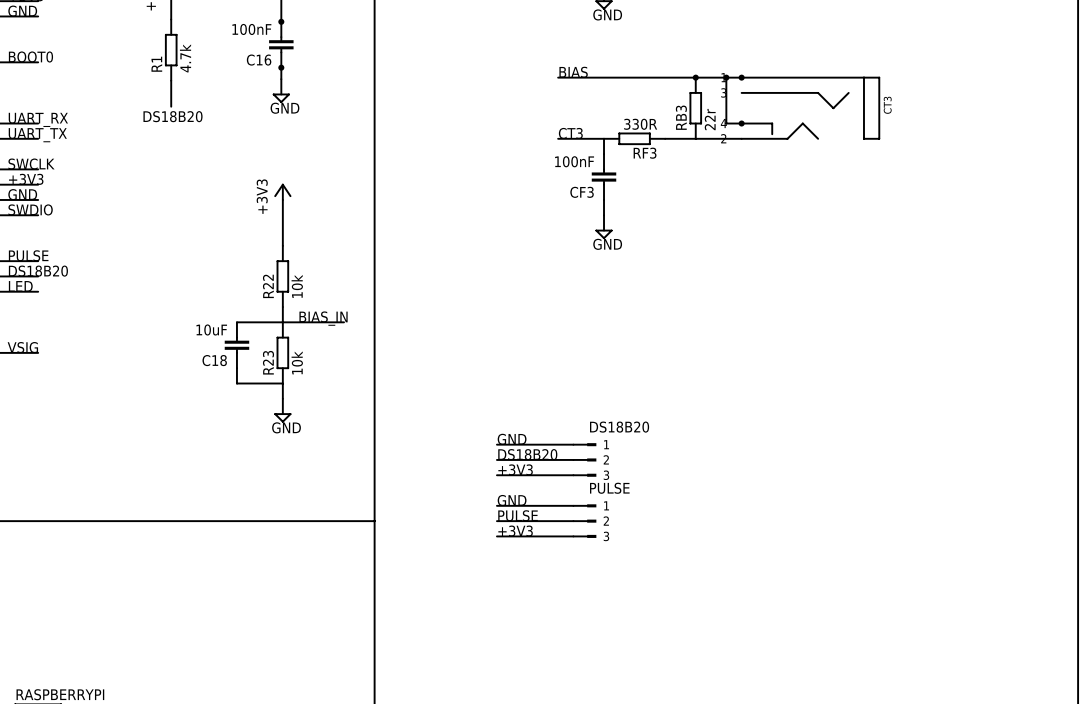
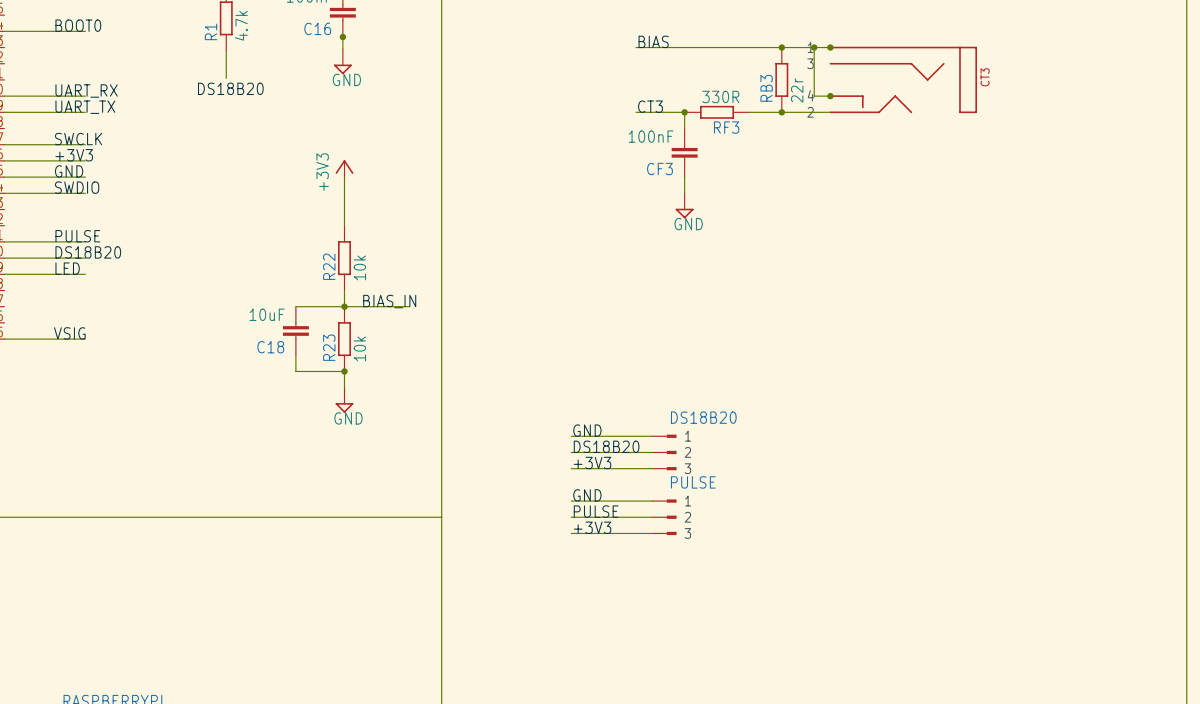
junction: none -> (684, 112)
junction: none -> (781, 112)
junction: none -> (344, 306)
junction: none -> (344, 371)

